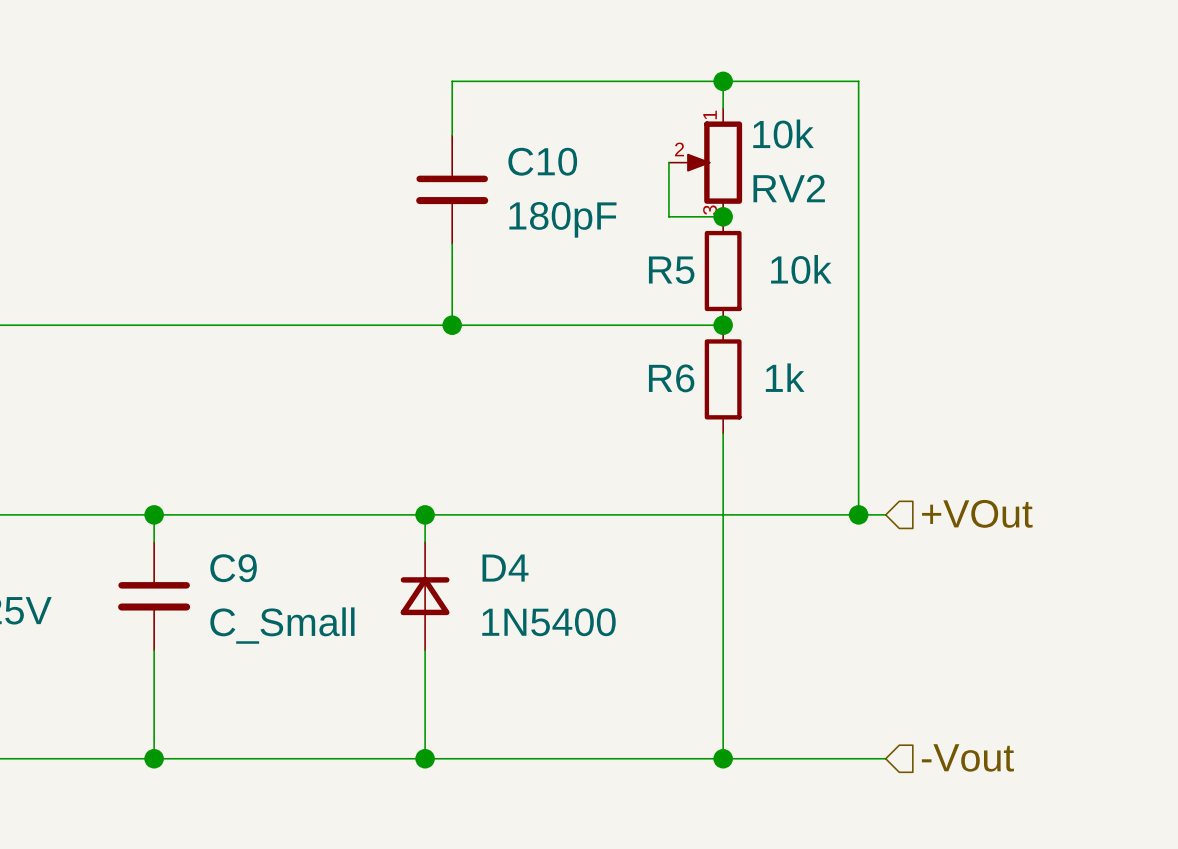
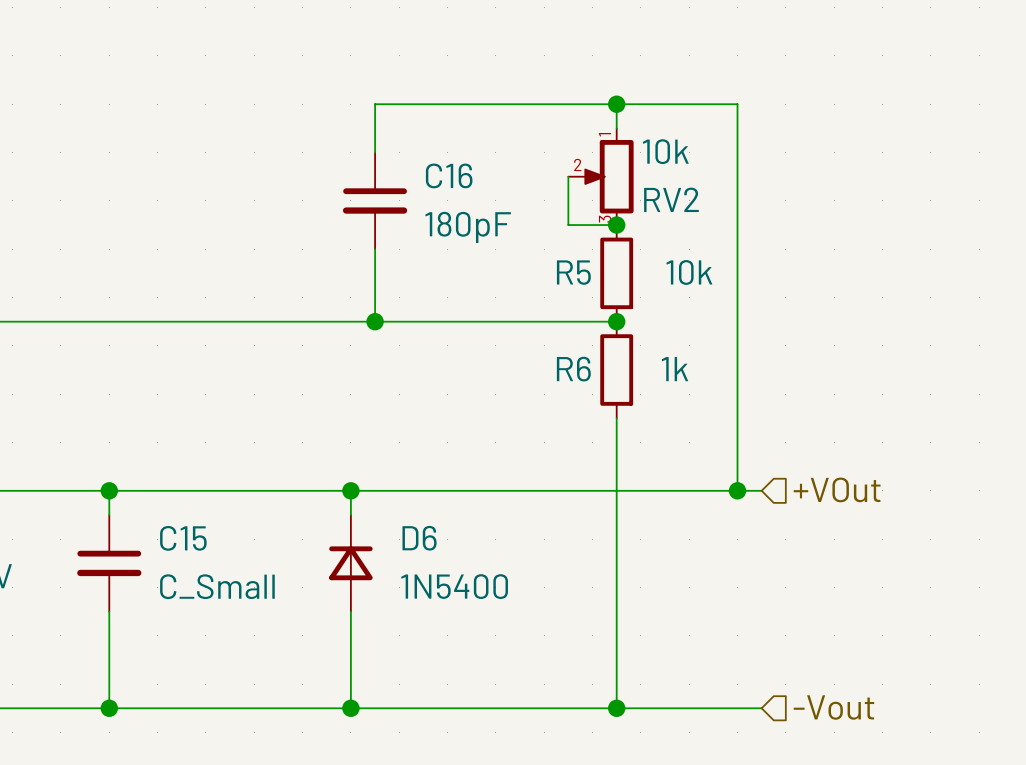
C10 name: C10 (542, 161) -> C16 (449, 175)
C9 name: C9 (233, 568) -> C15 (183, 538)
D4 name: D4 (505, 568) -> D6 (419, 538)

